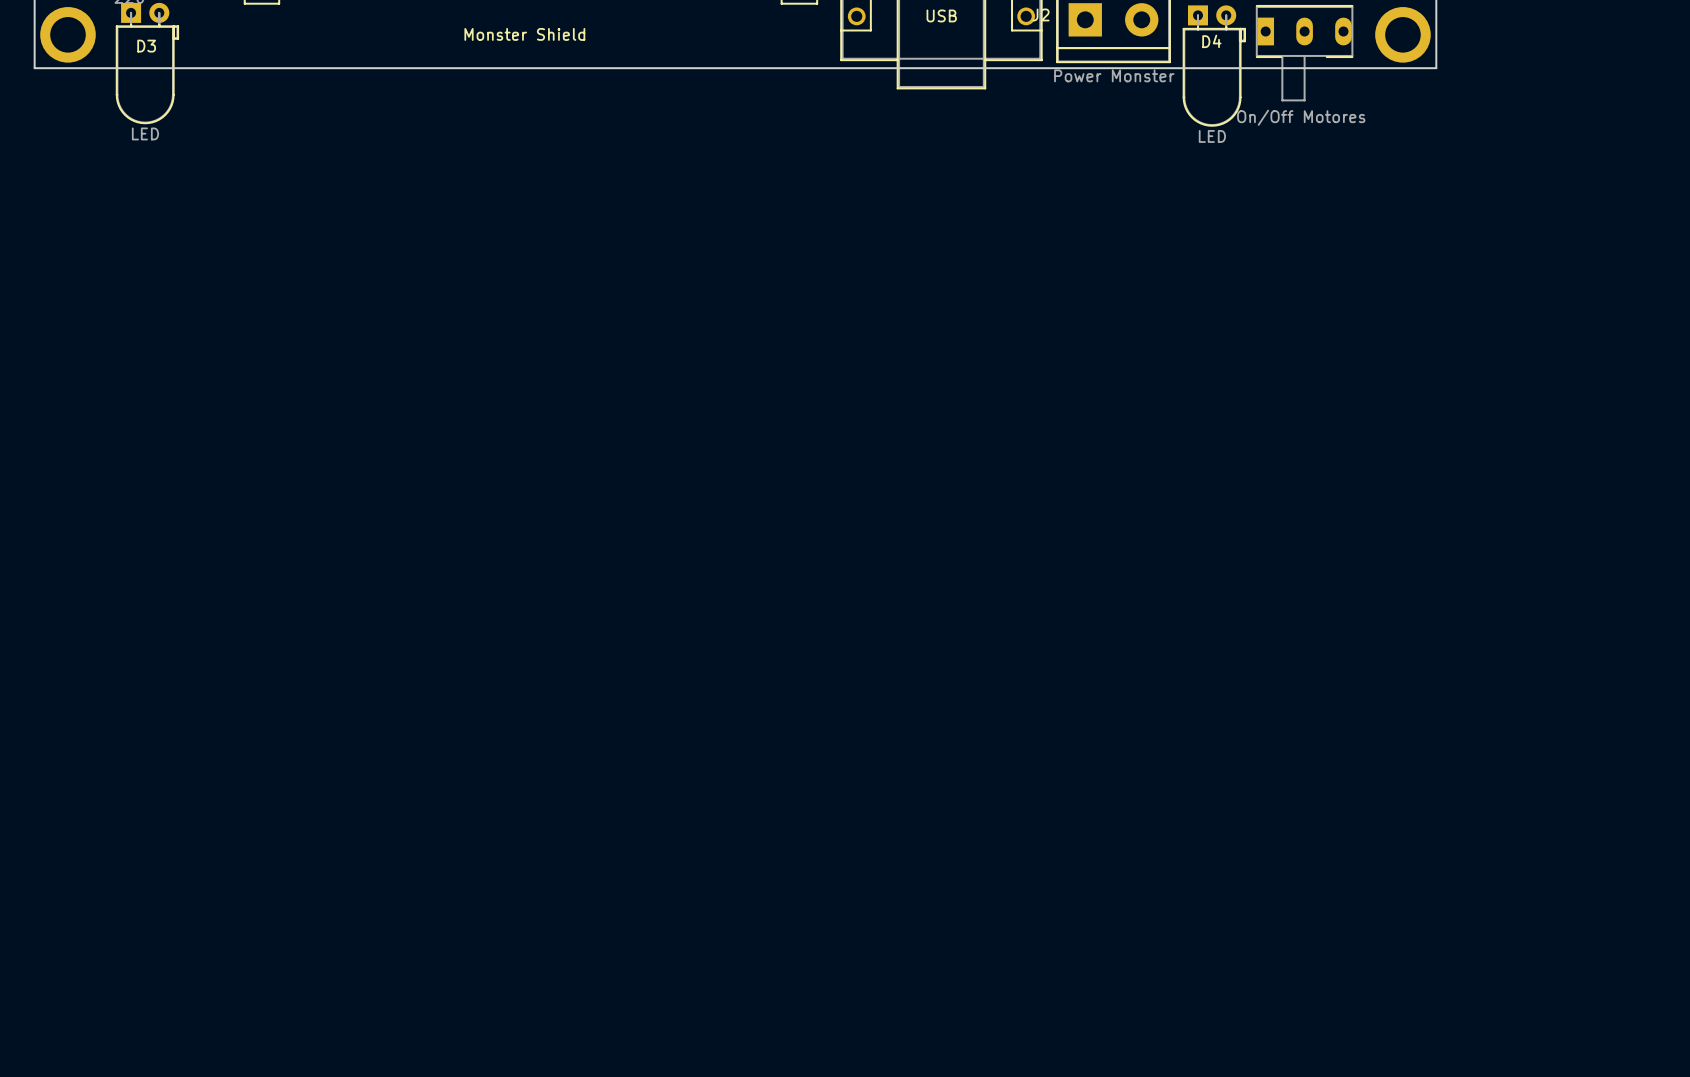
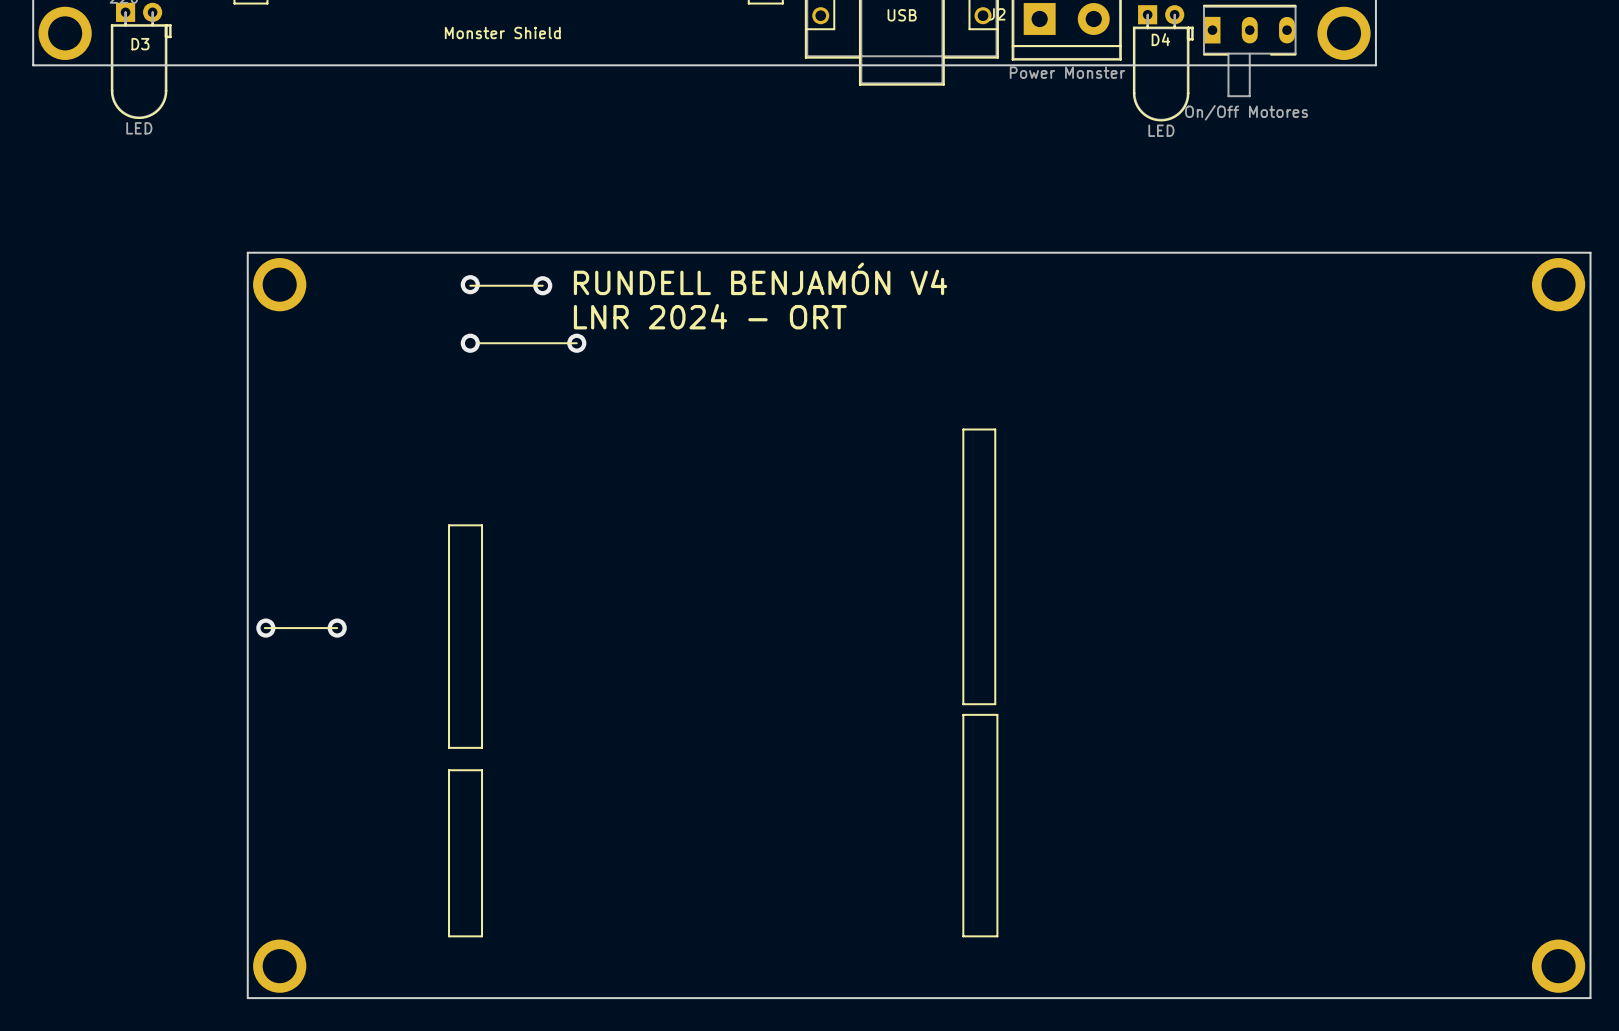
board edge: none -> (247, 252) (1590, 252) (1590, 998) (247, 998) (247, 252)
text: none -> RUNDELL BENJAMÓN V4 (760, 278)
part: none -> (279, 284)
via: none -> (470, 284)
part: none -> (1558, 284)
line: none -> (470, 285) (542, 285)
via: none -> (542, 285)
text: none -> LNR 2024 - ORT (710, 316)
via: none -> (470, 343)
line: none -> (478, 343) (576, 343)
via: none -> (576, 343)
line: none -> (963, 429) (963, 704) (995, 704) (995, 429) (963, 429)
line: none -> (449, 525) (482, 525) (482, 747) (449, 747) (449, 525)
line: none -> (264, 628) (337, 628)
via: none -> (265, 628)
via: none -> (337, 628)
line: none -> (963, 714) (997, 714) (997, 936) (963, 936) (963, 714)
line: none -> (449, 770) (449, 936) (482, 936) (482, 770) (449, 770)
part: none -> (279, 966)
part: none -> (1558, 966)

